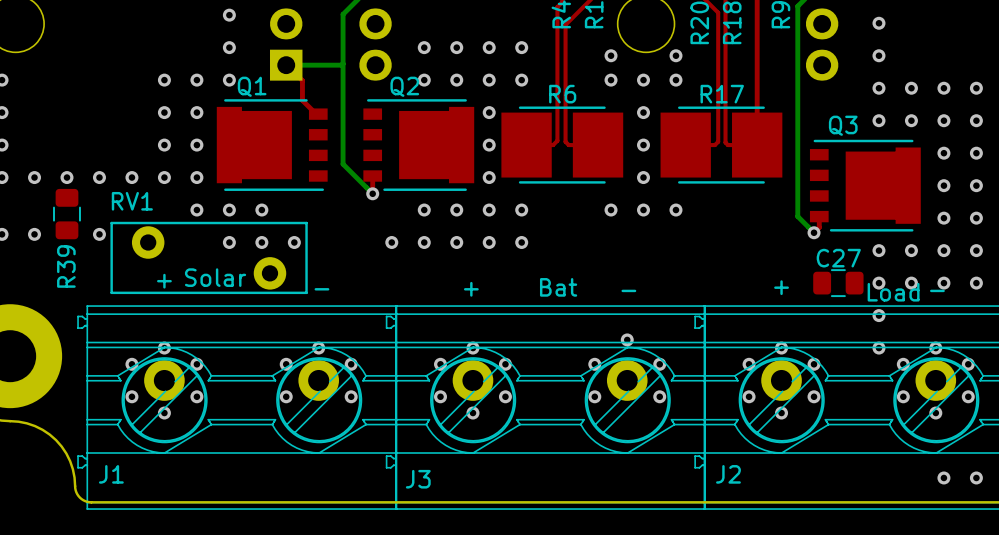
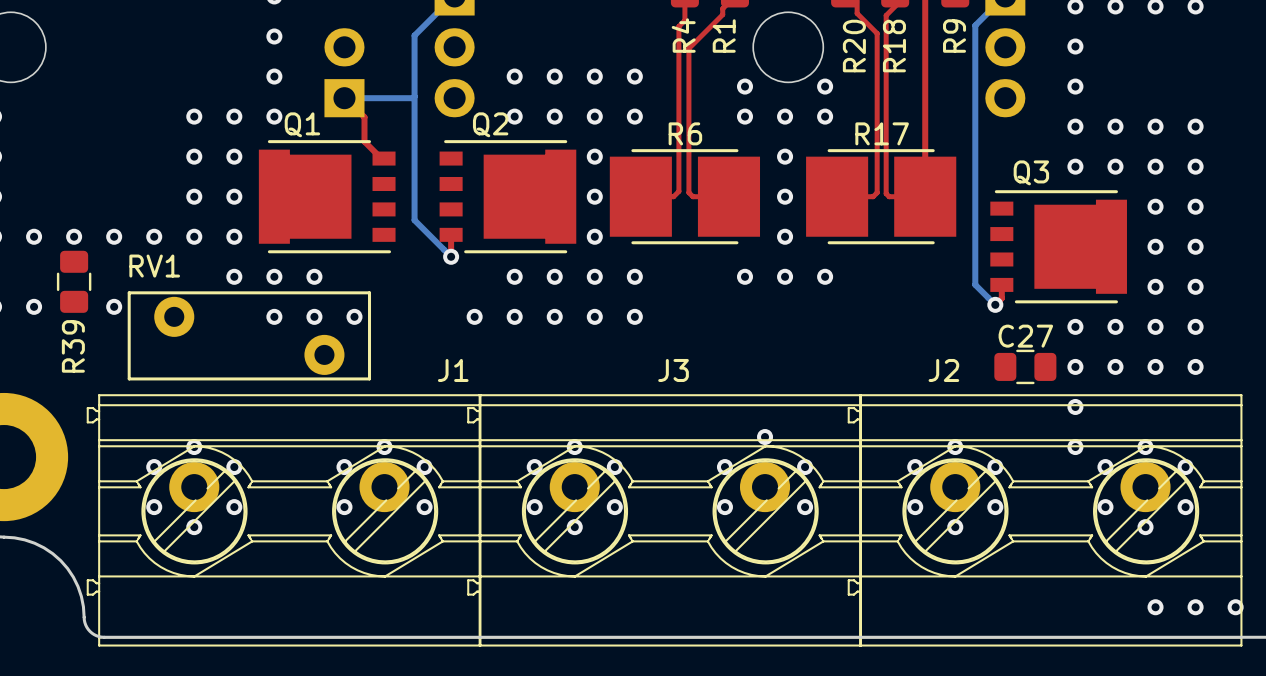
text: Solar (215, 277) -> none
text: + (164, 281) -> none
text: Bat (558, 287) -> none
text: + (781, 287) -> none
text: - (321, 289) -> none
text: + (471, 289) -> none
text: - (628, 290) -> none
text: - (937, 290) -> none
text: Load (893, 292) -> none
J1 name position: J1 (111, 474) -> J1 (453, 370)
J2 name position: J2 (728, 474) -> J2 (943, 370)
J3 name position: J3 (418, 479) -> J3 (673, 370)

